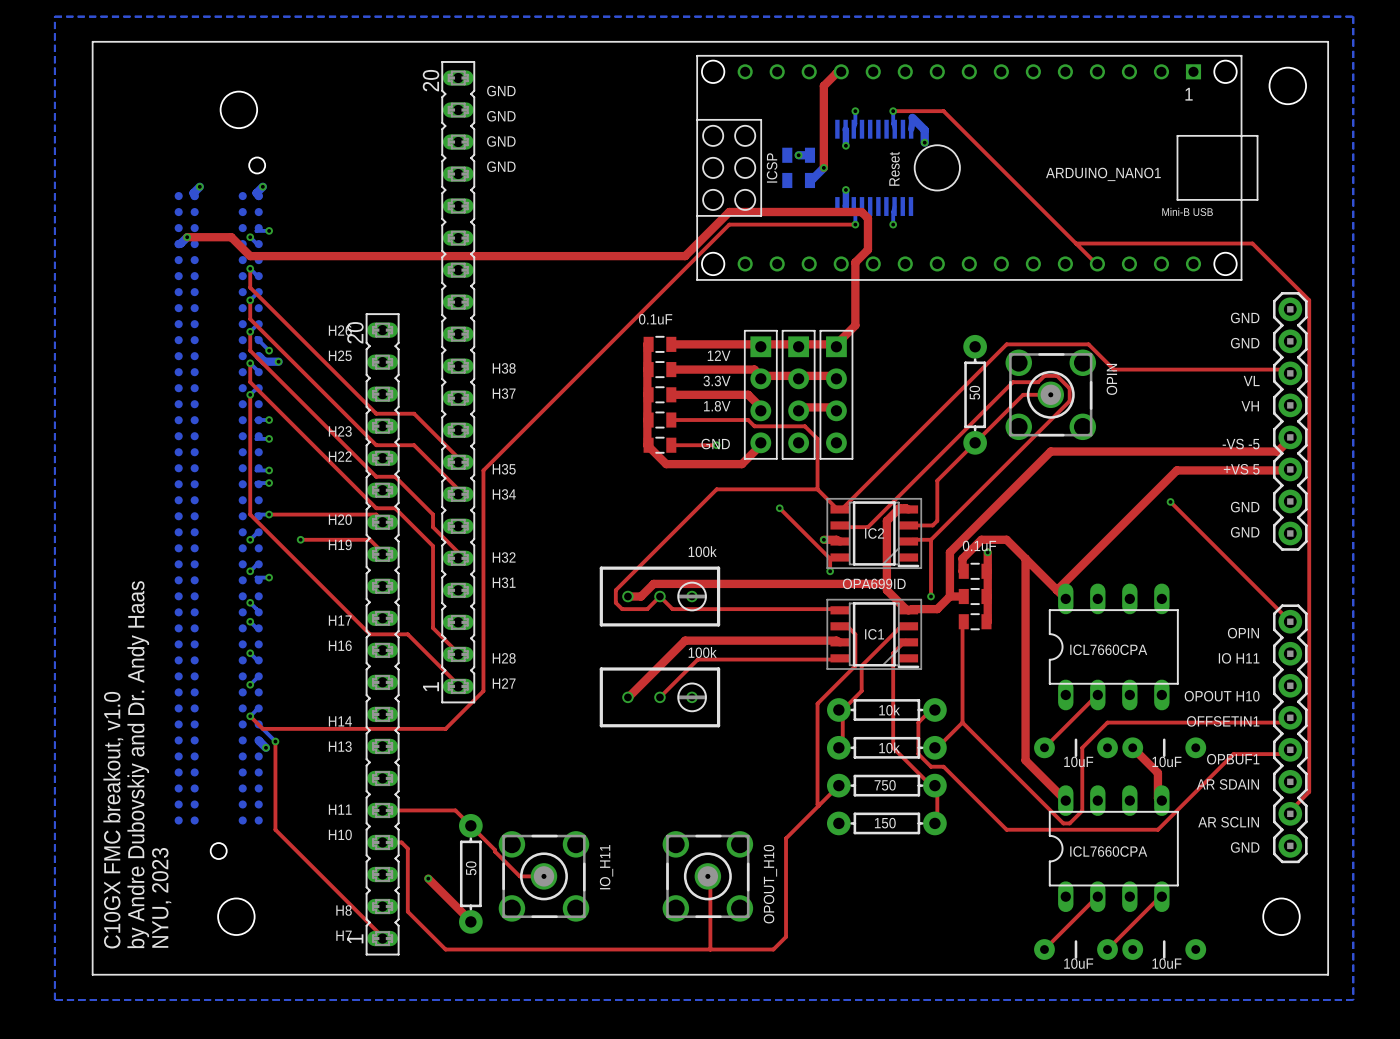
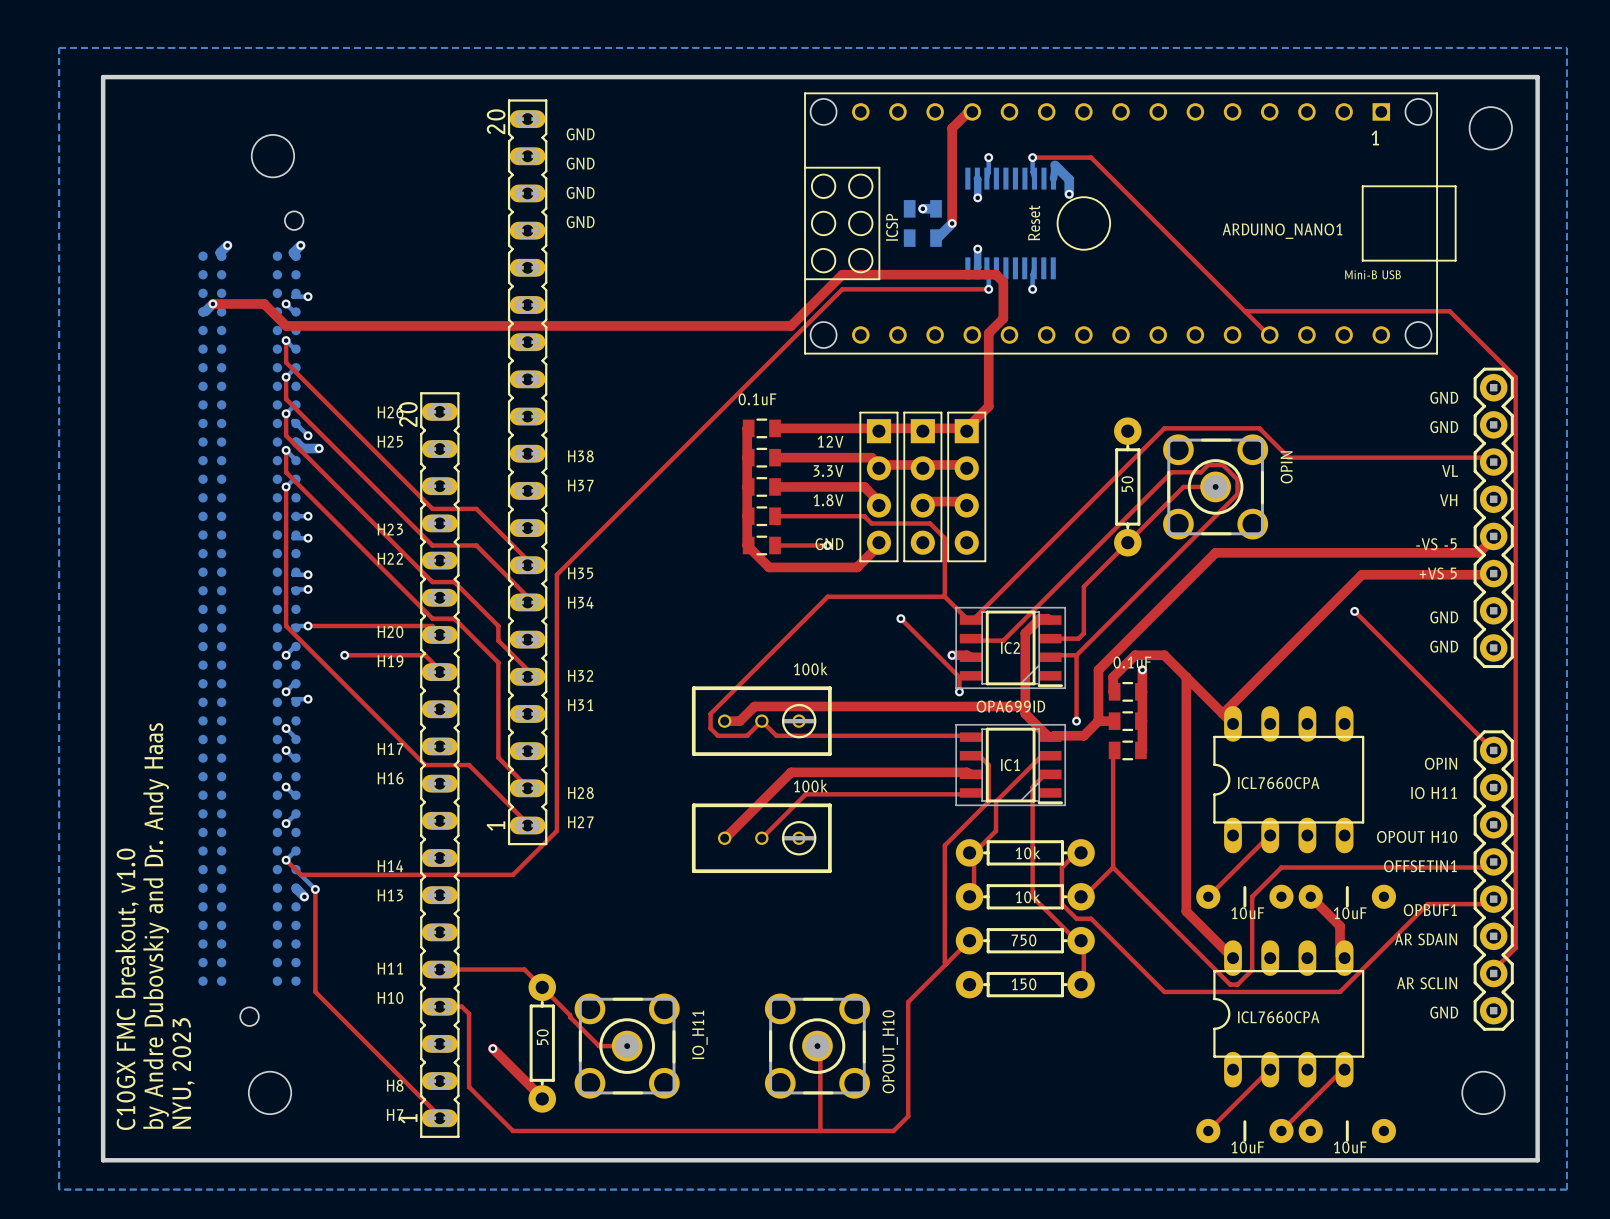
line: (92, 41) (92, 974) (1328, 974) (1328, 41) (92, 41) -> none
board edge: none -> (103, 77) (103, 1160) (1537, 1160) (1537, 77) (103, 77)

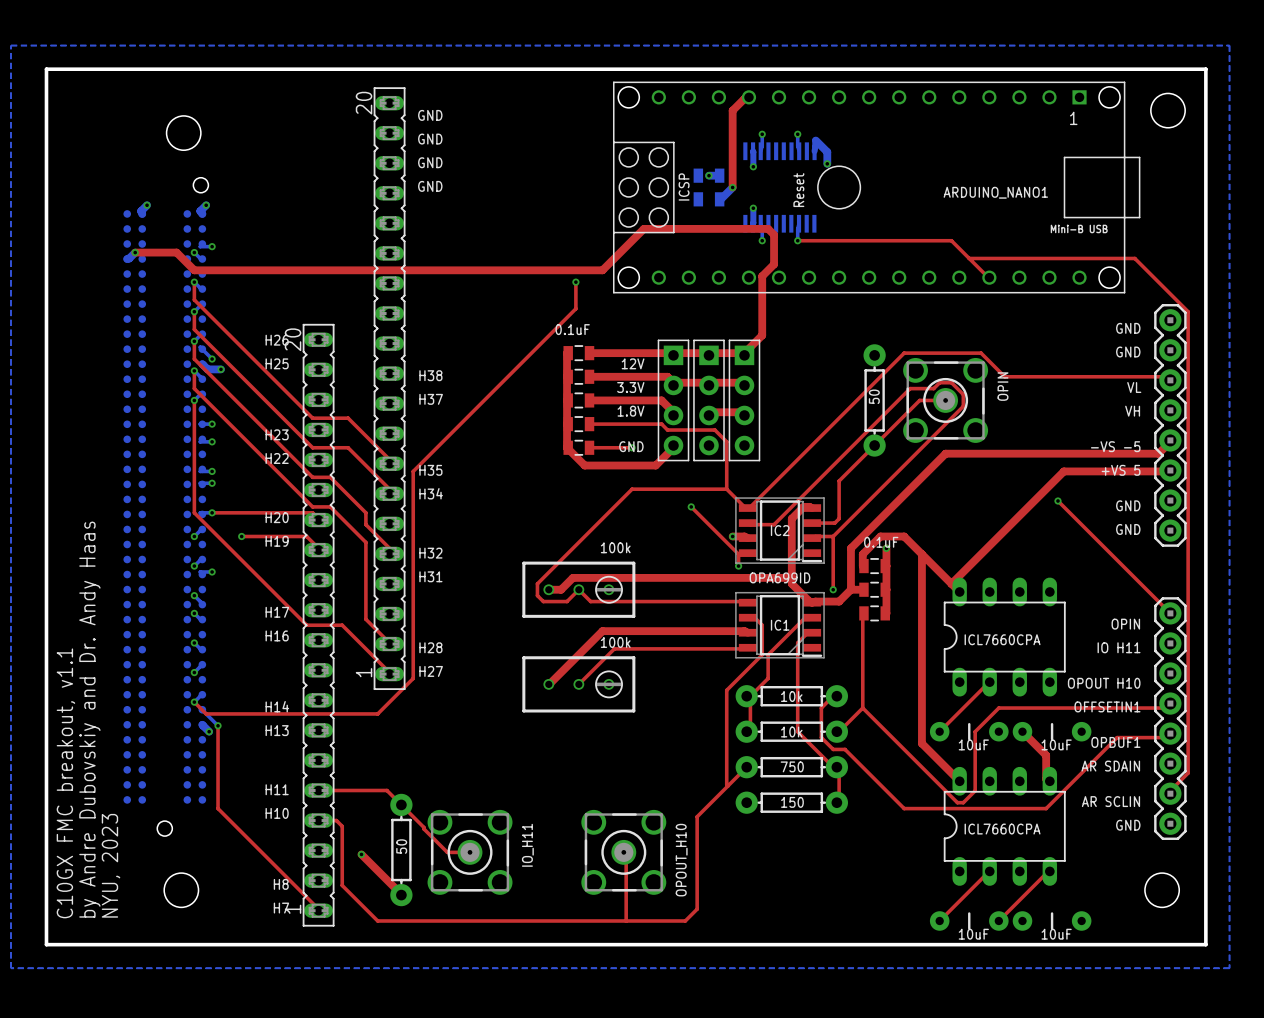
top track: (1032, 157) (1091, 157) (1222, 289) -> (800, 240) (951, 240)
top track: (988, 289) (842, 289) (758, 373) -> (575, 282) (575, 308)
via: none -> (575, 282)
text: C10GX FMC breakout, v1.0 (127, 989) -> C10GX FMC breakout, v1.1 (65, 783)

